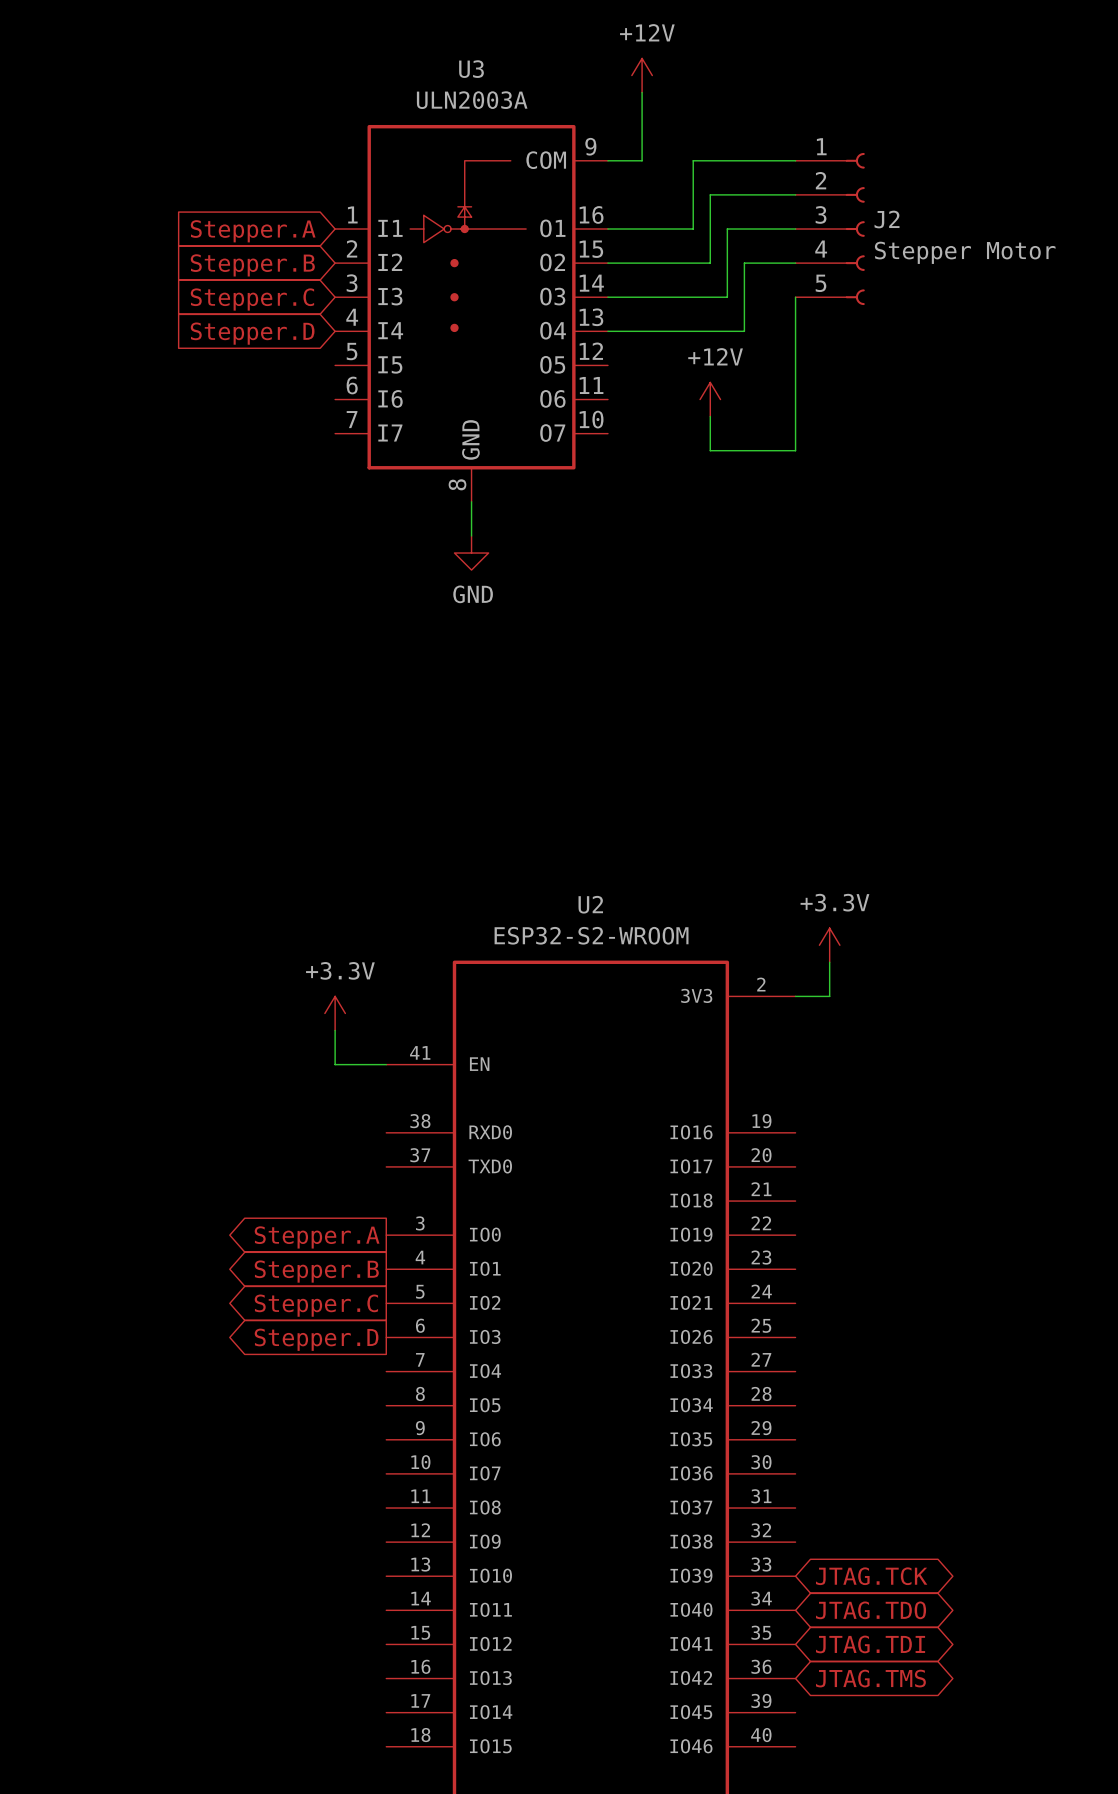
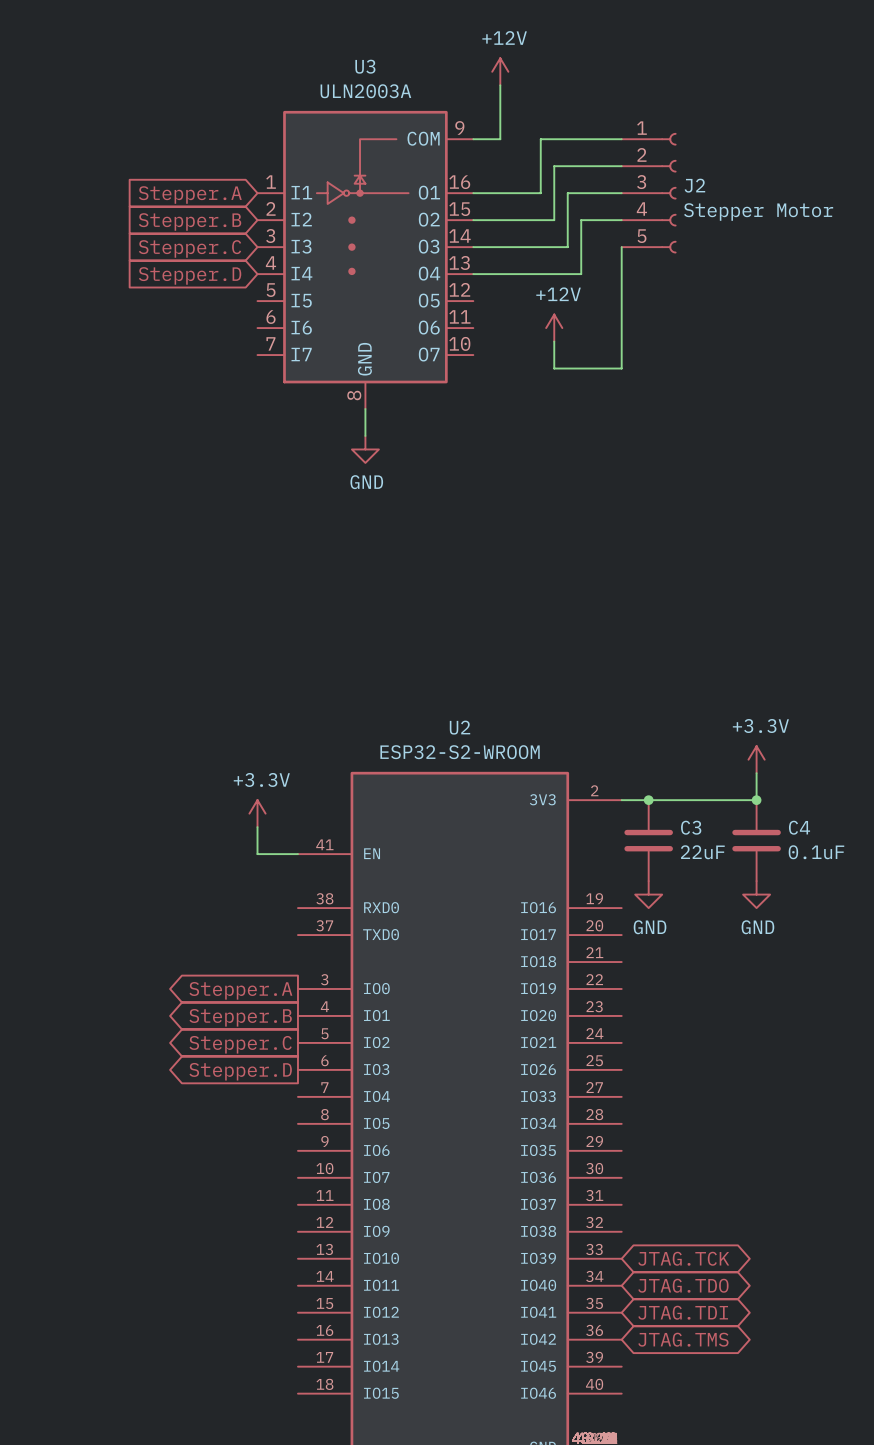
power symbol position: +3.3V (829, 945) -> +3.3V (756, 759)
wire: (829, 962) (829, 996) -> (756, 773) (756, 800) (648, 800)
junction: none -> (648, 800)
junction: none -> (756, 800)
C3: none -> 22uF (648, 840)
C4: none -> 0.1uF (756, 840)
power symbol: none -> GND (648, 894)
power symbol: none -> GND (756, 894)

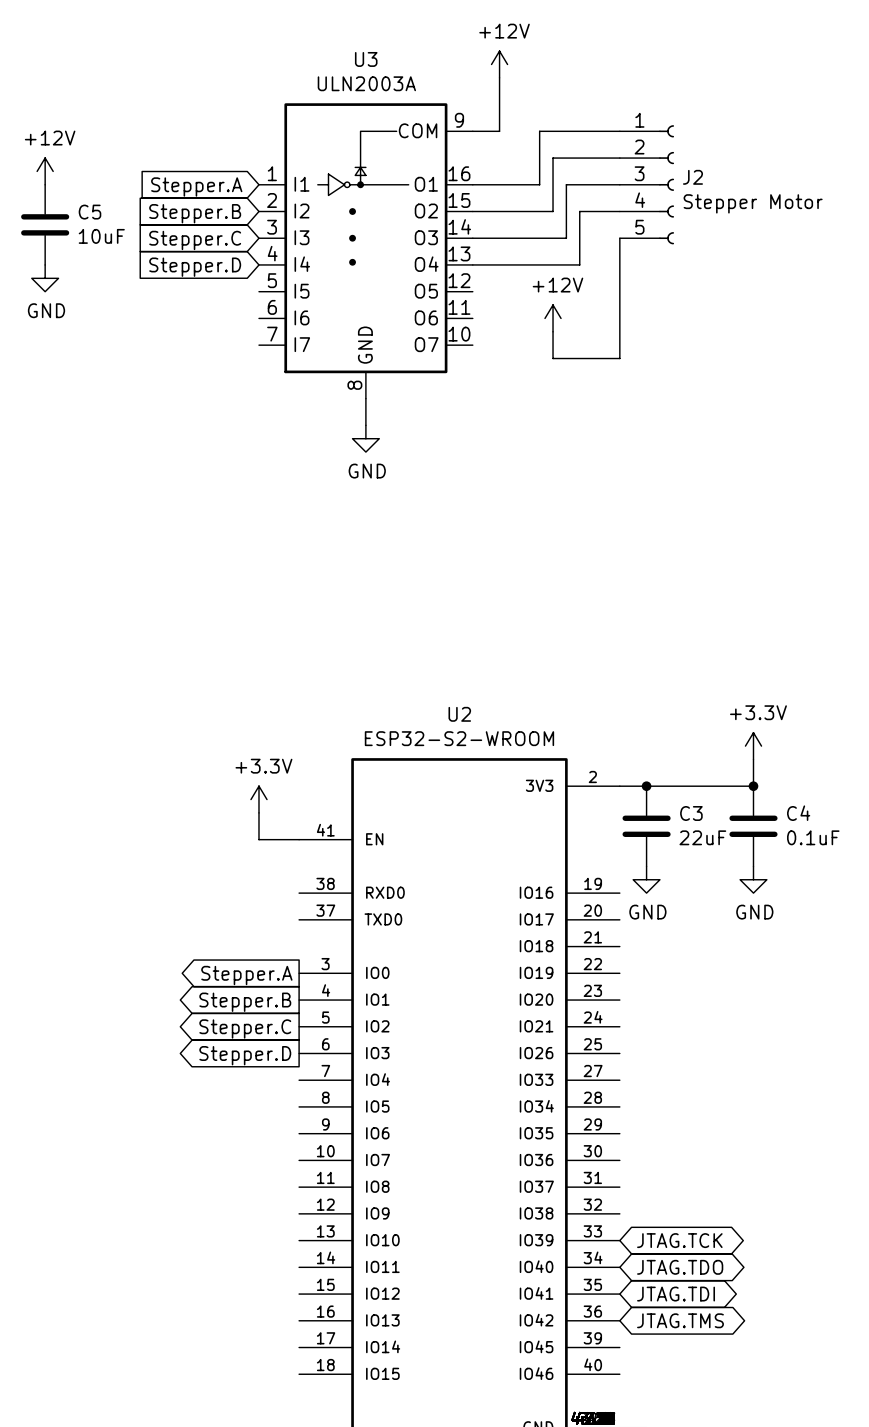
power symbol: none -> +12V (45, 171)
C5: none -> 10uF (45, 224)
power symbol: none -> GND (45, 278)

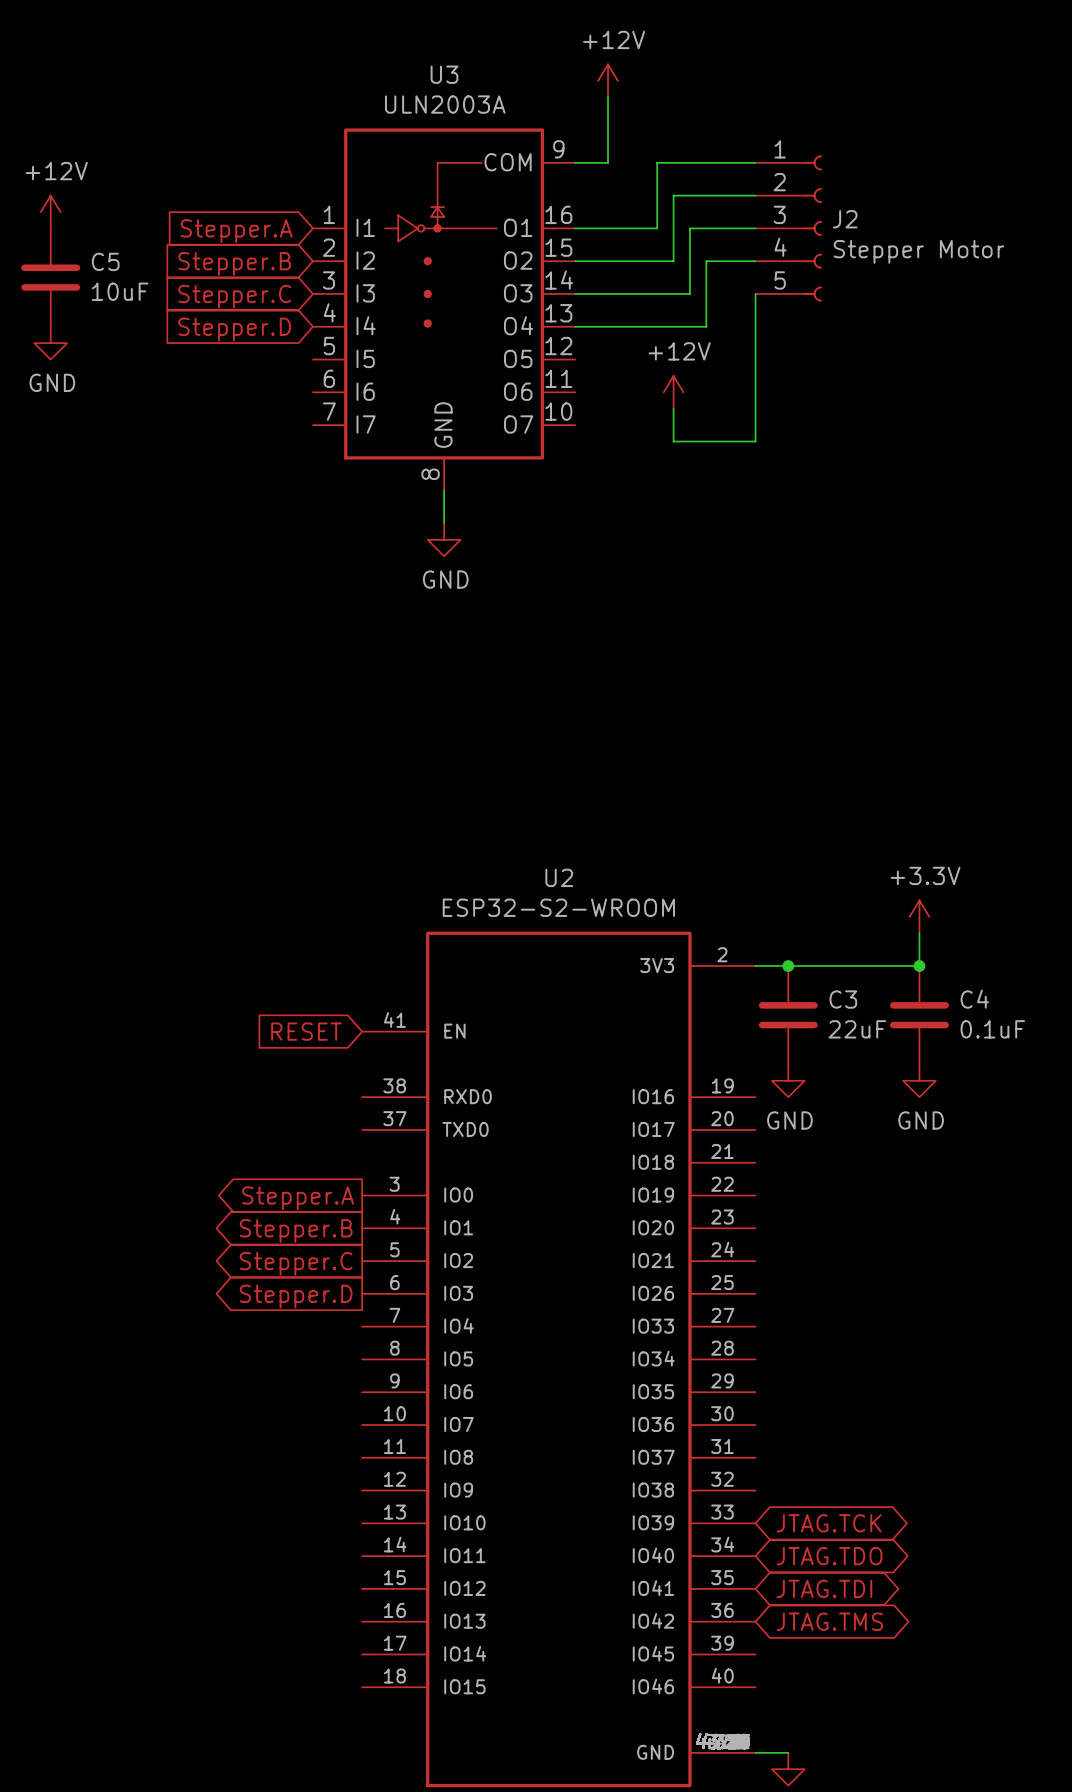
power symbol: +3.3V (258, 799) -> none
wire: (258, 812) (258, 839) (299, 839) -> none
global label: none -> RESET (306, 1031)

